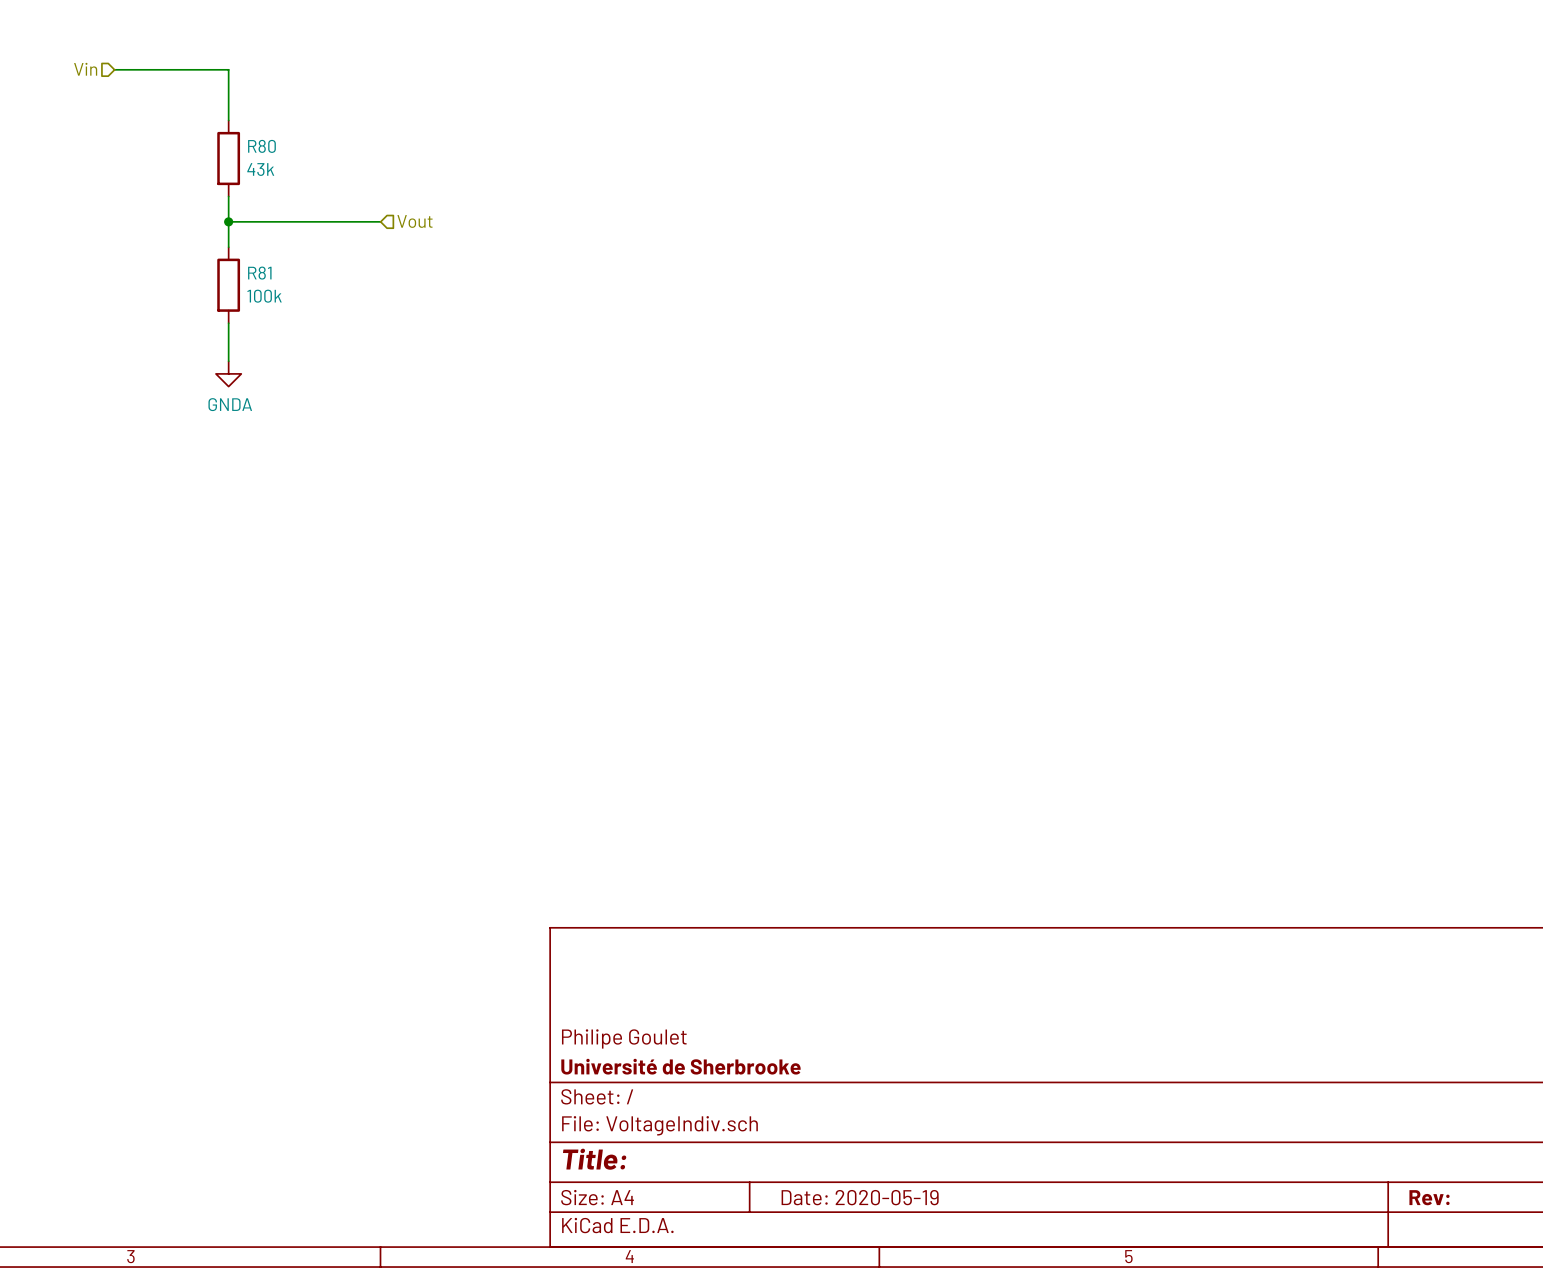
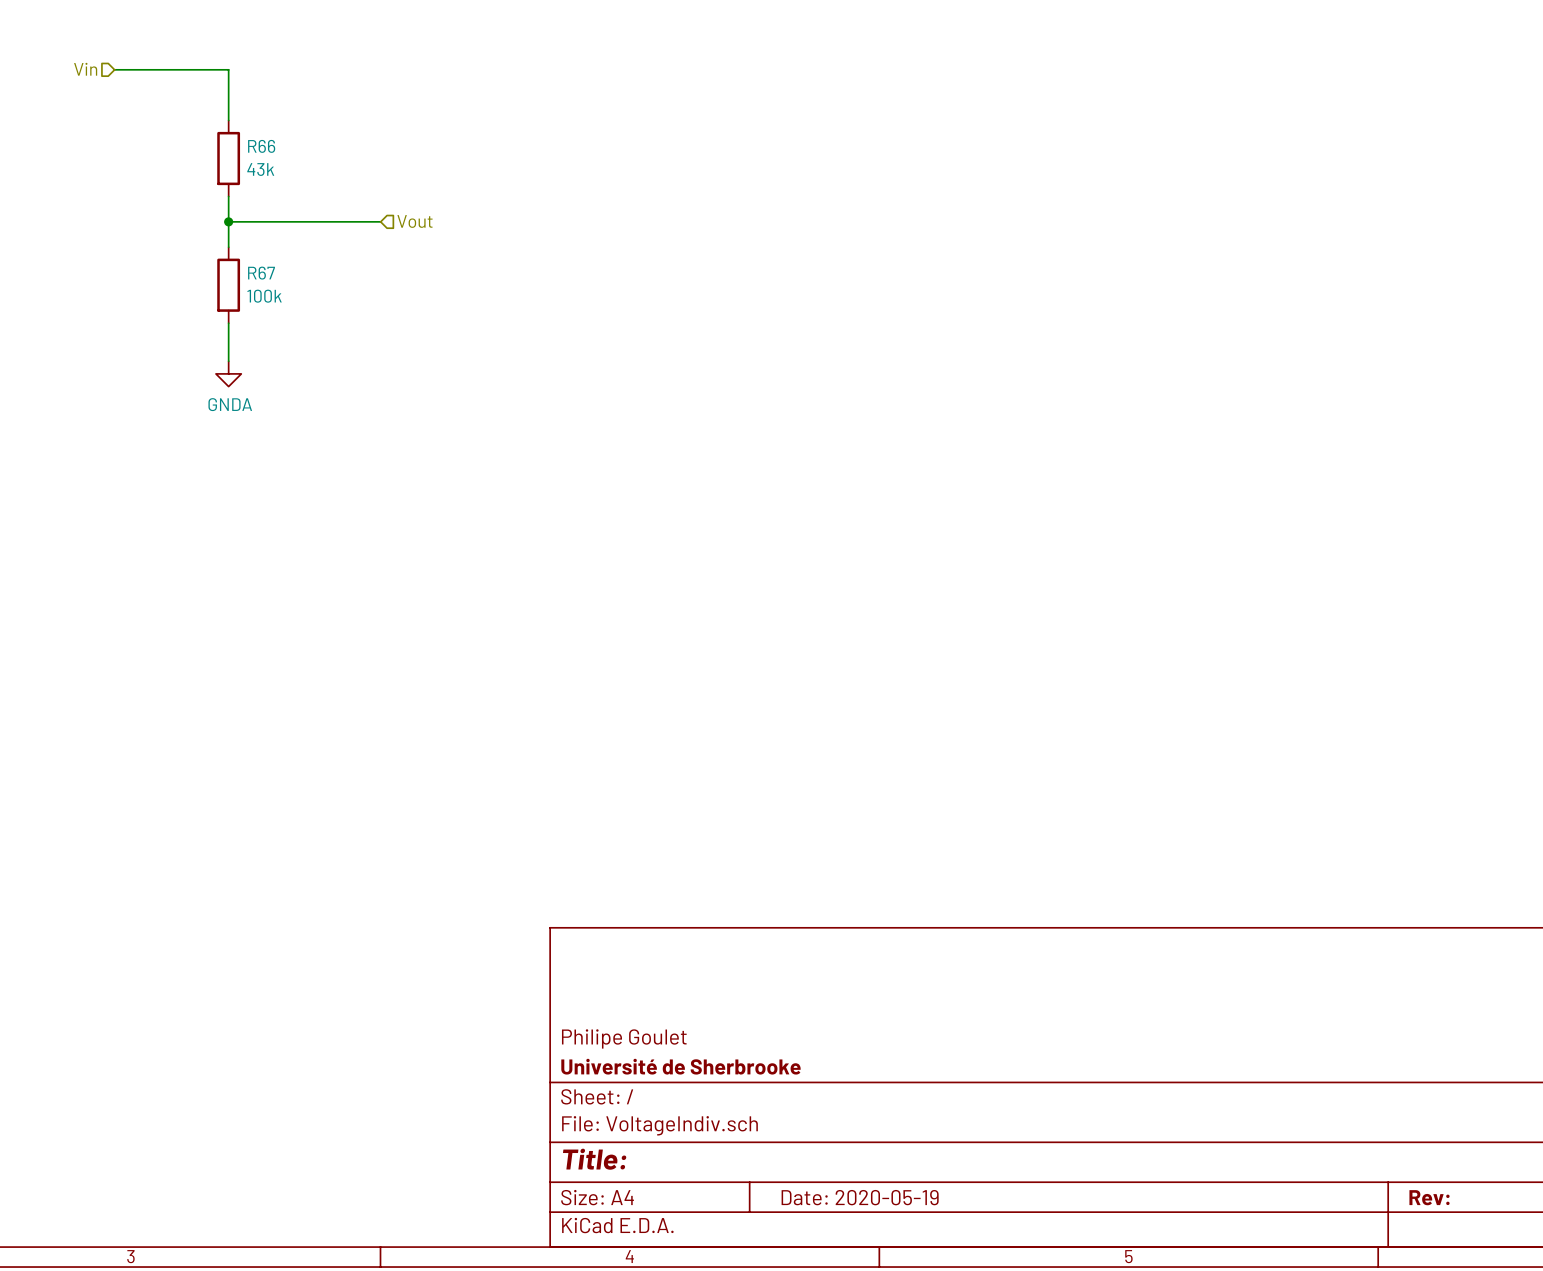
R80 name: R80 (261, 146) -> R66 (261, 146)
R81 name: R81 (259, 273) -> R67 (261, 273)

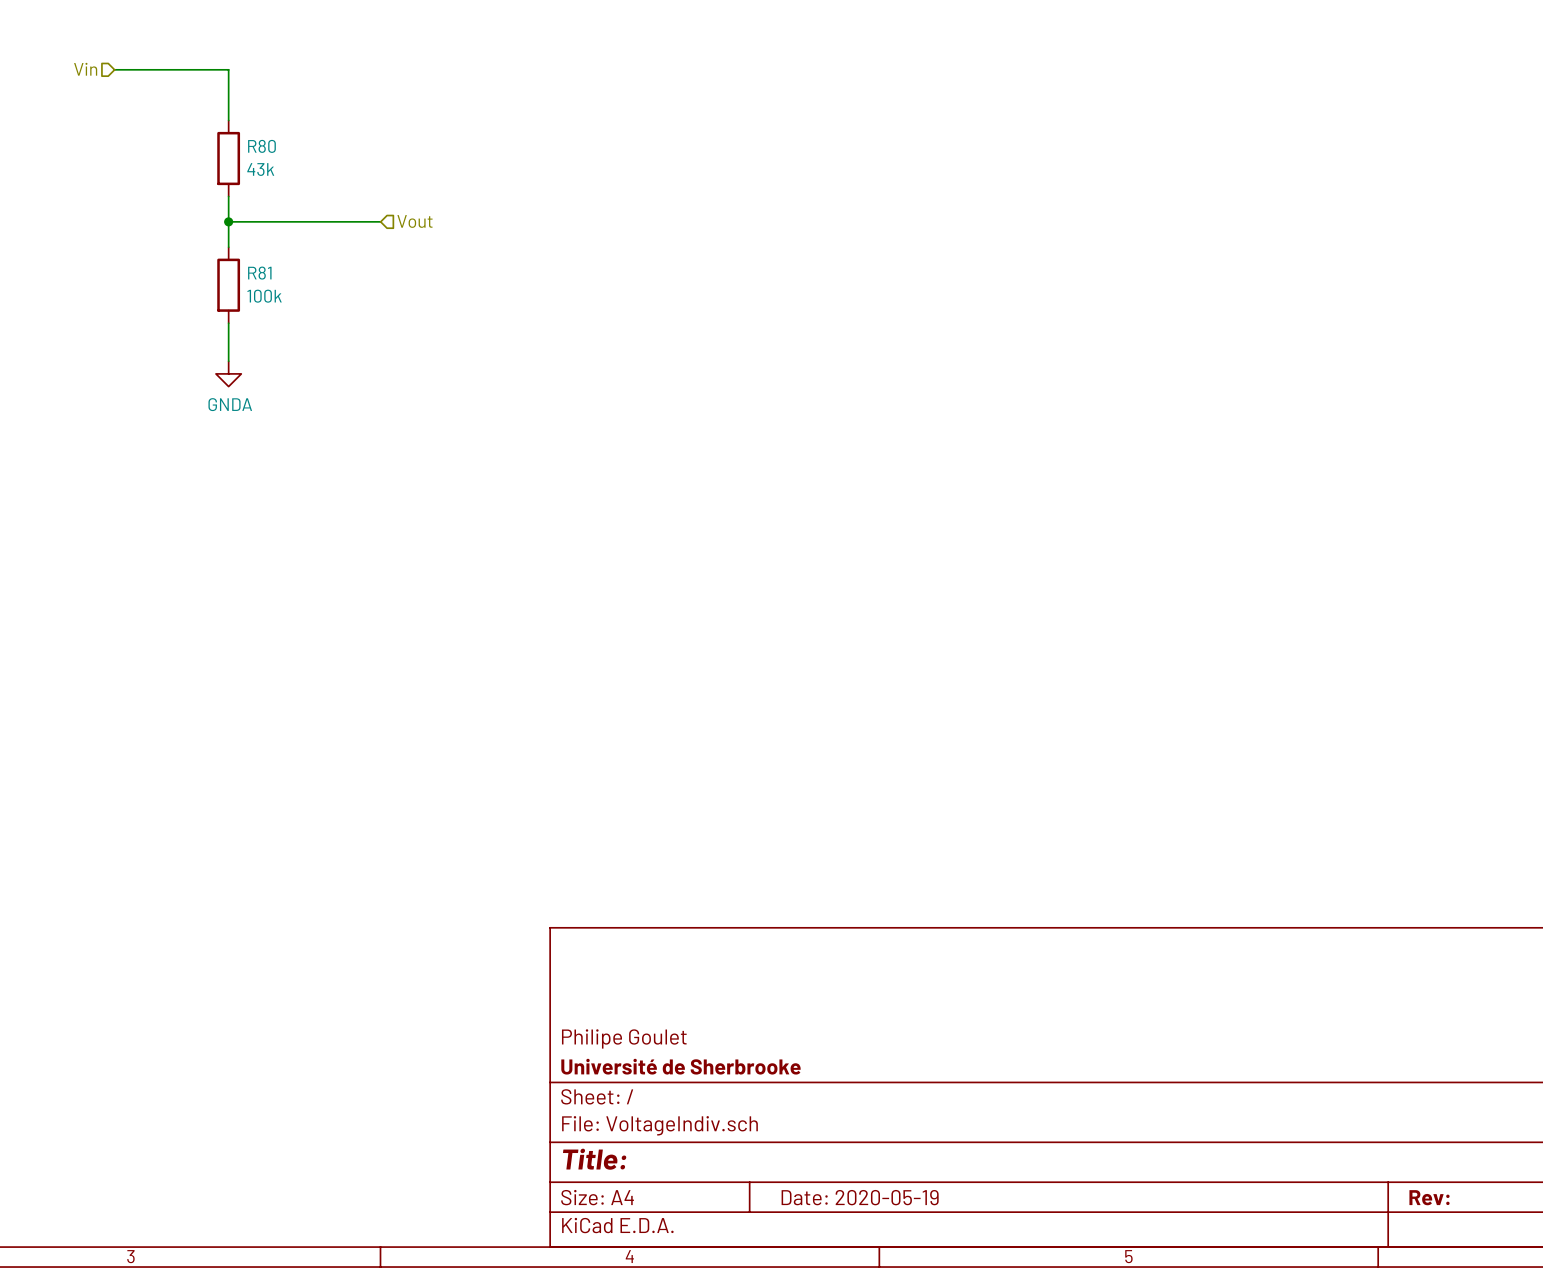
R66 name: R66 (261, 146) -> R80 (261, 146)
R67 name: R67 (261, 273) -> R81 (259, 273)

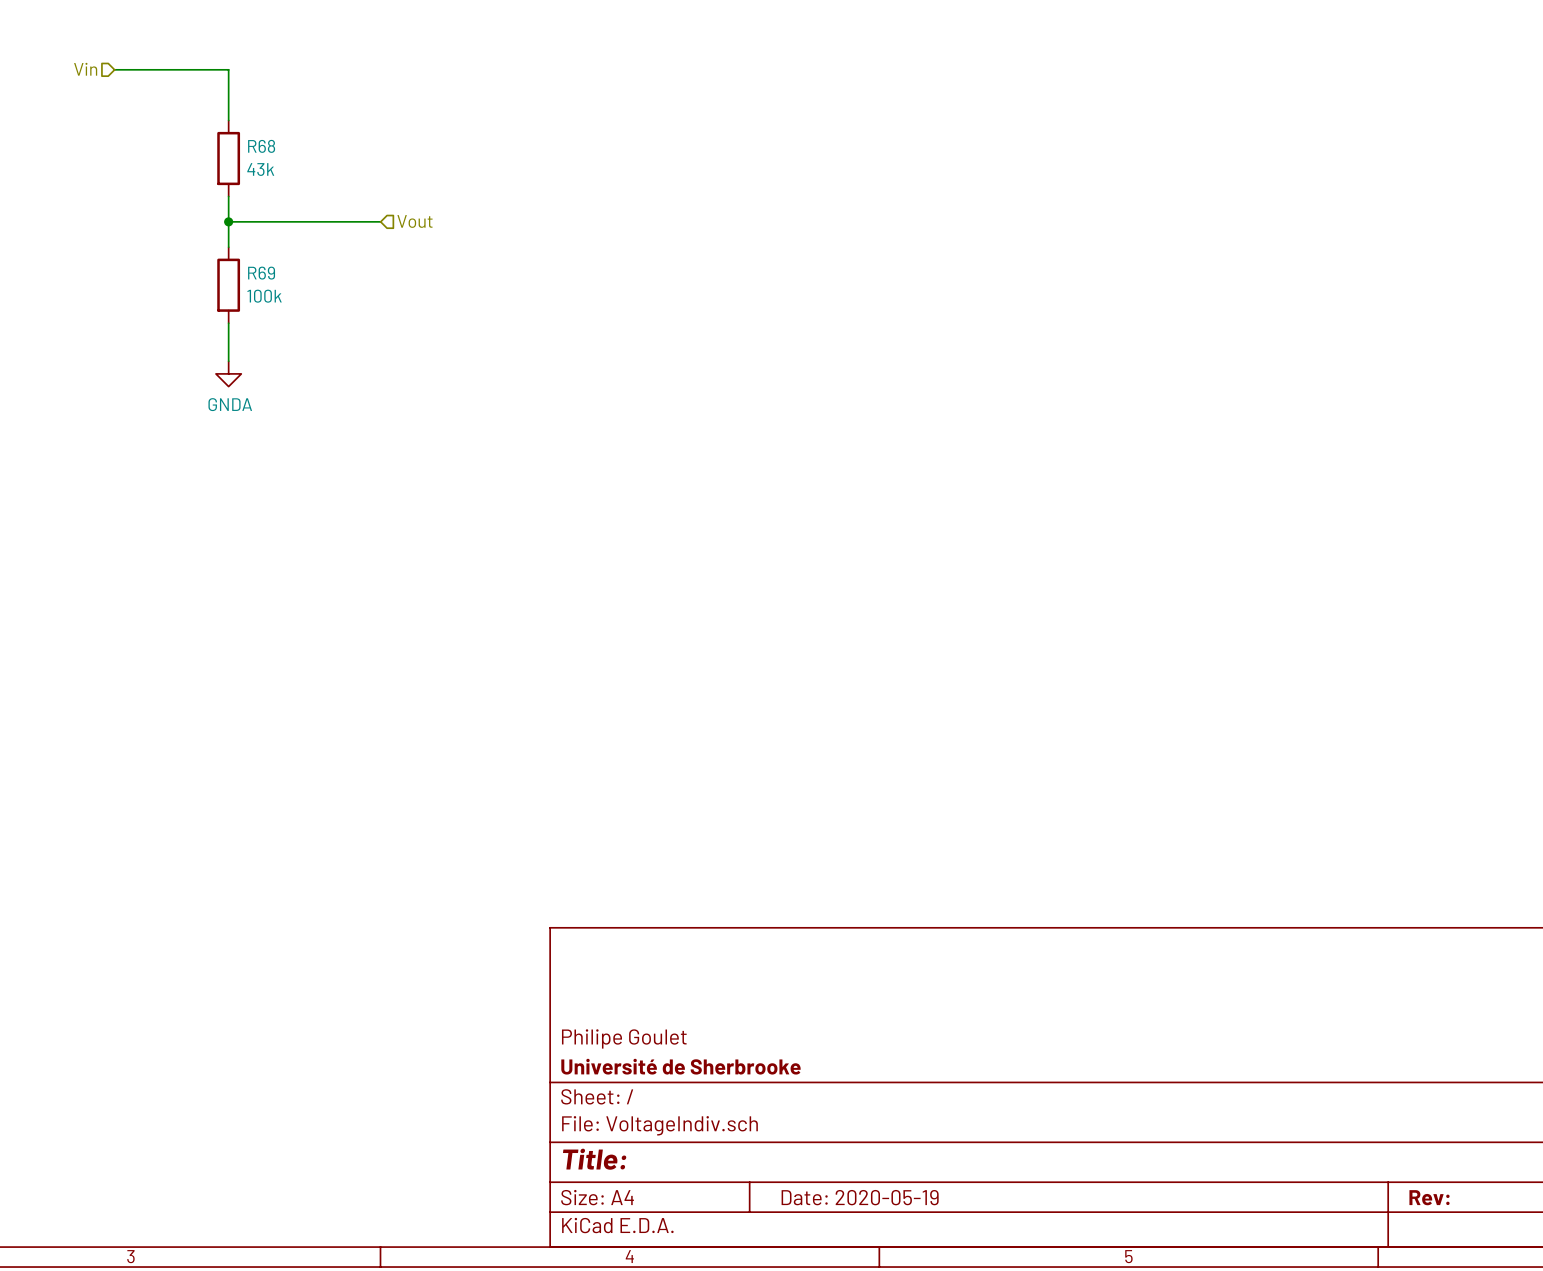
R80 name: R80 (261, 146) -> R68 (261, 146)
R81 name: R81 (259, 273) -> R69 (261, 273)

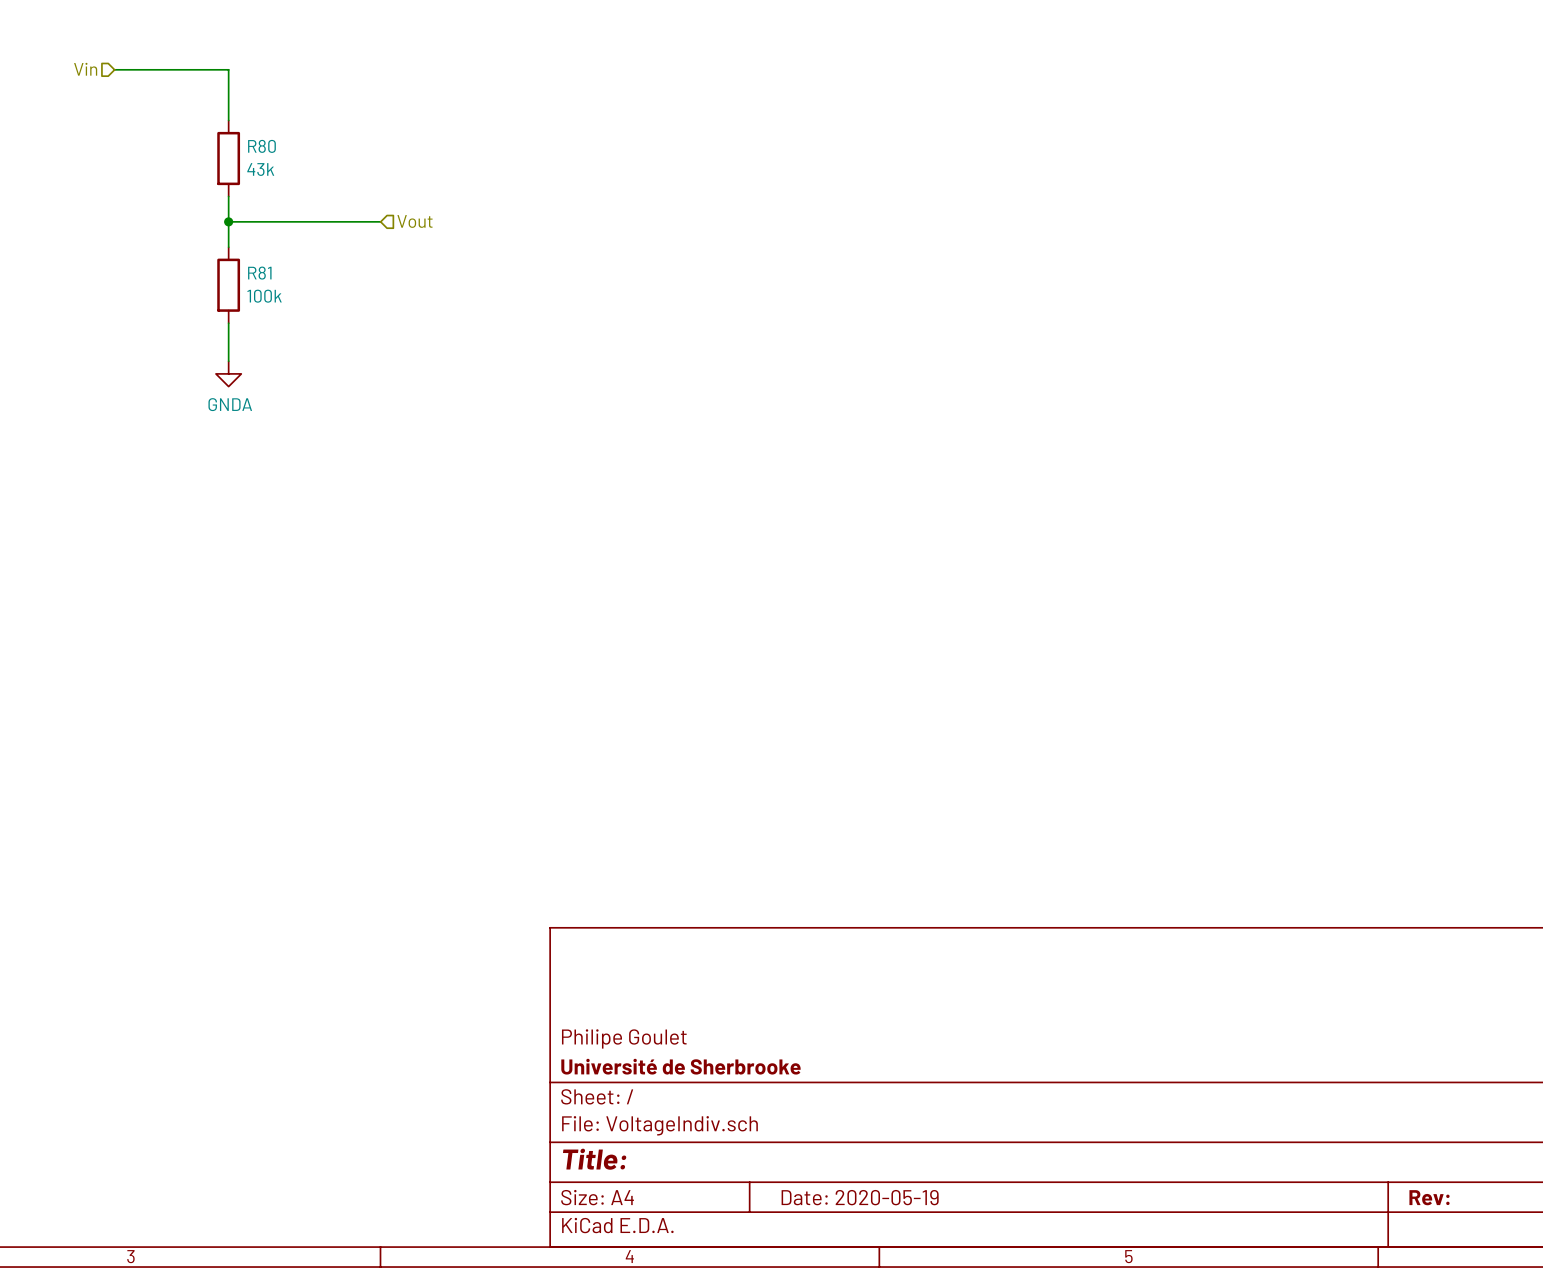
R68 name: R68 (261, 146) -> R80 (261, 146)
R69 name: R69 (261, 273) -> R81 (259, 273)

